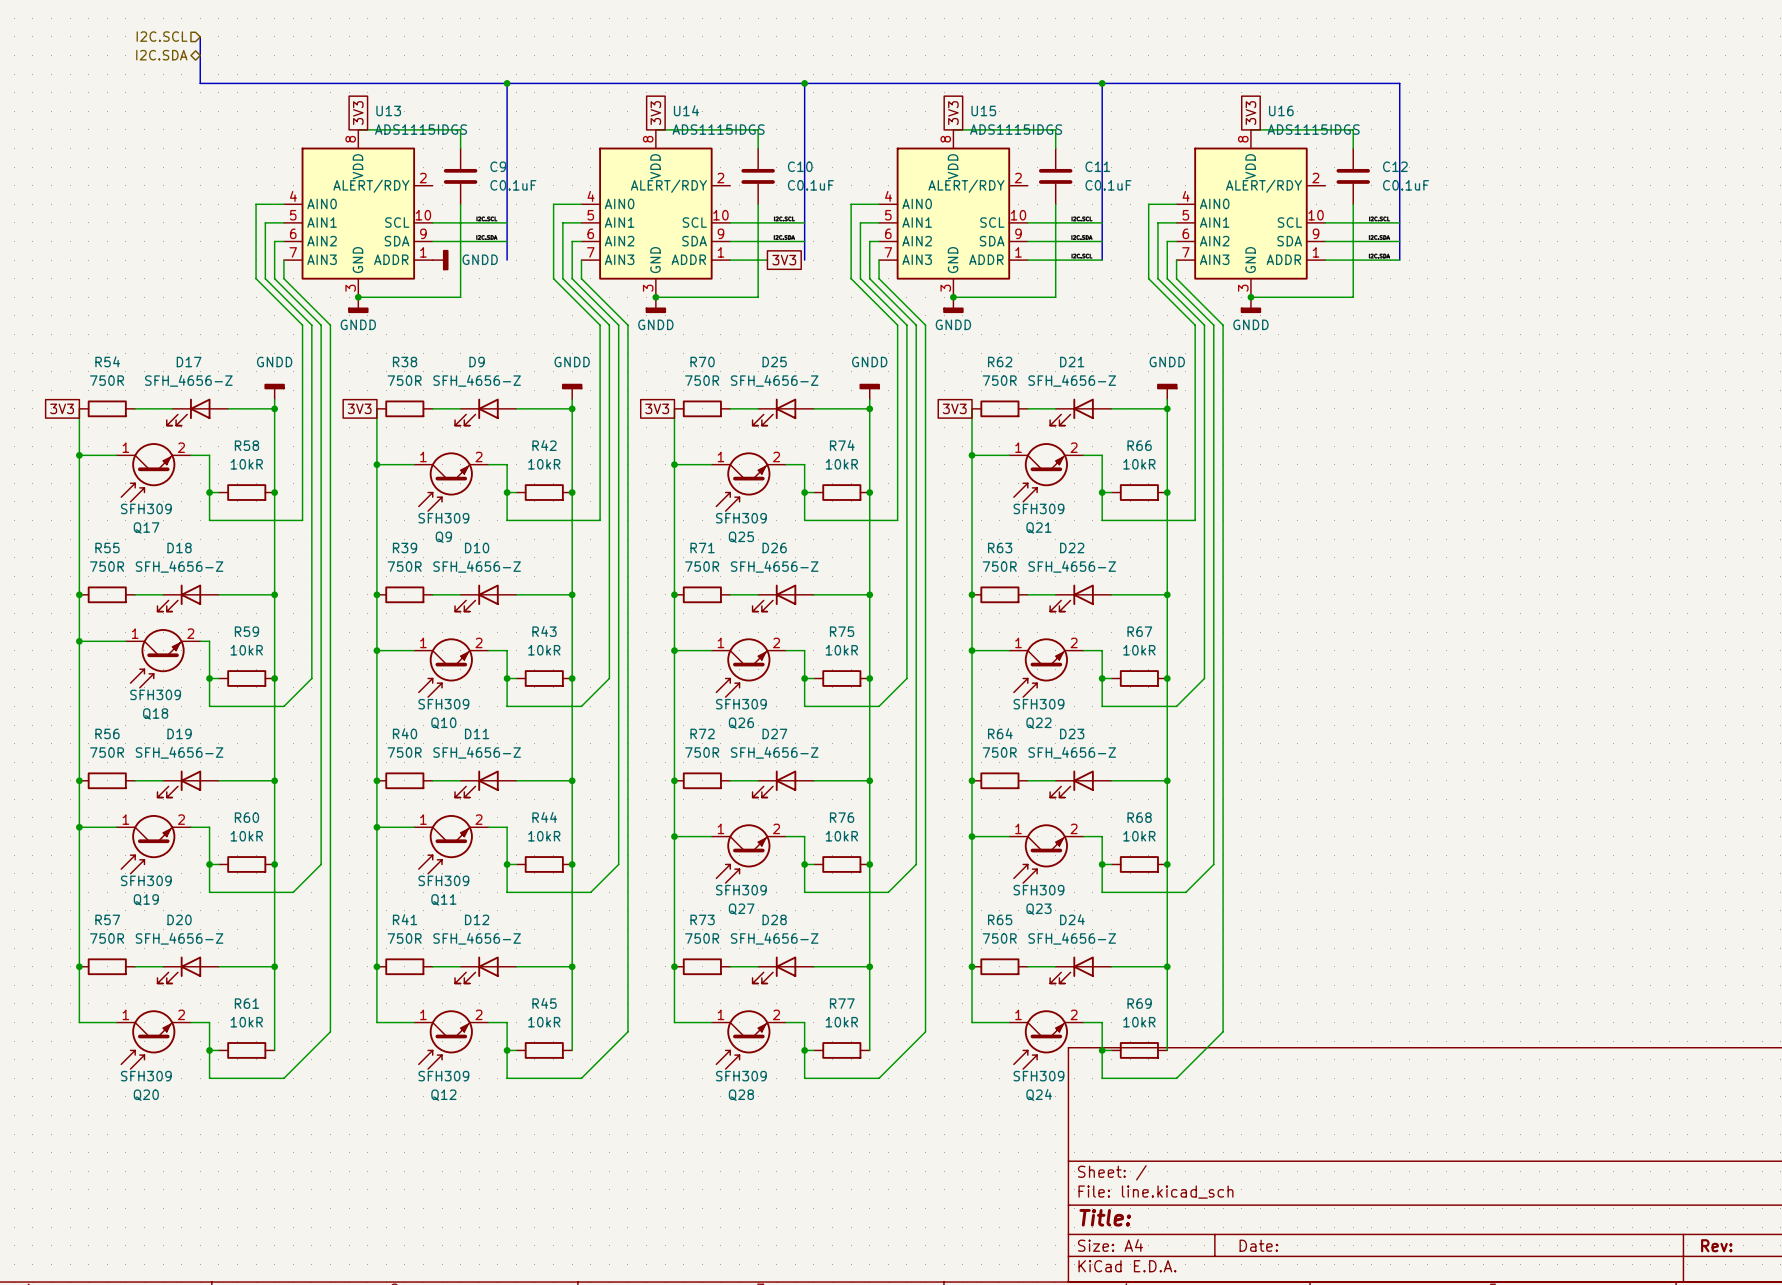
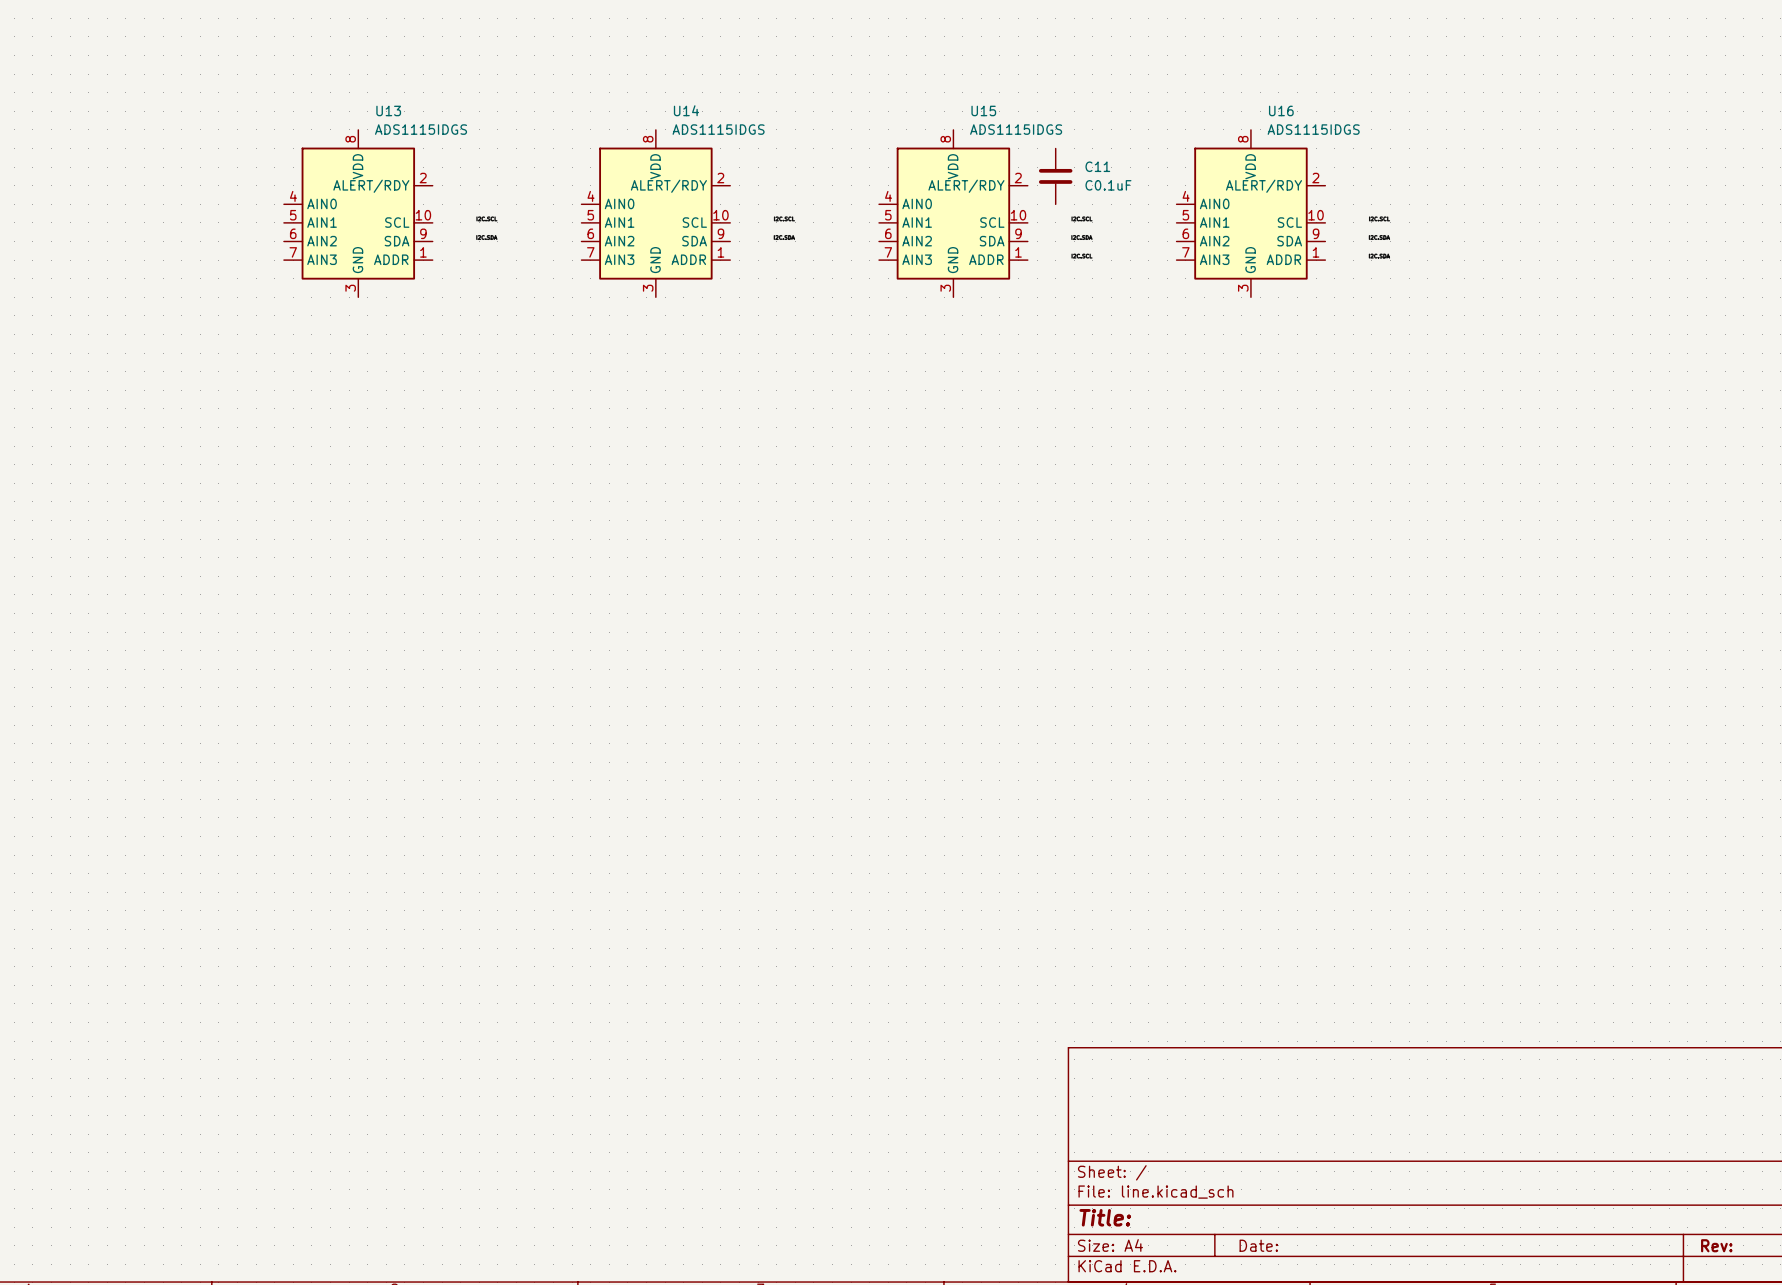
hierarchical label: I2C.SCL (162, 36) -> none
bus: (200, 36) (200, 83) (1399, 83) (1399, 260) -> none
hierarchical label: I2C.SDA (161, 55) -> none
bus: (507, 83) (507, 260) -> none
junction: (507, 83) -> none
bus: (804, 83) (804, 260) -> none
junction: (804, 83) -> none
bus: (1102, 83) (1102, 260) -> none
junction: (1102, 83) -> none
global label: 3V3 (358, 113) -> none
global label: 3V3 (655, 113) -> none
global label: 3V3 (953, 113) -> none
global label: 3V3 (1250, 113) -> none
wire: (358, 129) (460, 129) (460, 148) -> none
wire: (655, 129) (758, 129) (758, 148) -> none
wire: (953, 129) (1055, 129) (1055, 148) -> none
wire: (1250, 129) (1353, 129) (1353, 148) -> none
C9: C0.1uF (460, 176) -> none
C10: C0.1uF (758, 176) -> none
C12: C0.1uF (1353, 176) -> none
wire: (283, 204) (256, 204) (256, 278) (302, 325) (302, 520) (209, 520) (209, 455) (190, 455) -> none
wire: (460, 204) (460, 297) (358, 297) -> none
wire: (581, 204) (553, 204) (553, 278) (600, 325) (600, 520) (507, 520) (507, 464) (488, 464) -> none
wire: (758, 204) (758, 297) (655, 297) -> none
wire: (879, 204) (851, 204) (851, 278) (897, 325) (897, 520) (804, 520) (804, 464) (786, 464) -> none
wire: (1055, 204) (1055, 297) (953, 297) -> none
wire: (1176, 204) (1148, 204) (1148, 278) (1195, 325) (1195, 520) (1102, 520) (1102, 455) (1083, 455) -> none
wire: (1353, 204) (1353, 297) (1250, 297) -> none
wire: (283, 222) (265, 222) (265, 278) (311, 325) (311, 678) (283, 706) (209, 706) (209, 641) (200, 641) -> none
wire: (432, 222) (507, 222) -> none
wire: (581, 222) (562, 222) (562, 278) (609, 325) (609, 678) (581, 706) (507, 706) (507, 650) (488, 650) -> none
wire: (730, 222) (804, 222) -> none
wire: (879, 222) (860, 222) (860, 278) (906, 325) (906, 678) (879, 706) (804, 706) (804, 650) (786, 650) -> none
wire: (1027, 222) (1102, 222) -> none
wire: (1176, 222) (1157, 222) (1157, 278) (1204, 325) (1204, 678) (1176, 706) (1102, 706) (1102, 650) (1083, 650) -> none
wire: (1325, 222) (1399, 222) -> none
wire: (283, 241) (274, 241) (274, 278) (321, 325) (321, 864) (293, 892) (209, 892) (209, 827) (190, 827) -> none
wire: (432, 241) (507, 241) -> none
wire: (581, 241) (572, 241) (572, 278) (618, 325) (618, 864) (590, 892) (507, 892) (507, 827) (488, 827) -> none
wire: (730, 241) (804, 241) -> none
wire: (879, 241) (869, 241) (869, 278) (916, 325) (916, 864) (888, 892) (804, 892) (804, 836) (786, 836) -> none
wire: (1027, 241) (1102, 241) -> none
wire: (1176, 241) (1167, 241) (1167, 278) (1213, 325) (1213, 864) (1185, 892) (1102, 892) (1102, 836) (1083, 836) -> none
wire: (1325, 241) (1399, 241) -> none
wire: (283, 260) (283, 278) (330, 325) (330, 1031) (283, 1078) (209, 1078) (209, 1022) (190, 1022) -> none
power symbol: GNDD (440, 260) -> none
wire: (581, 260) (581, 278) (627, 325) (627, 1031) (581, 1078) (507, 1078) (507, 1022) (488, 1022) -> none
wire: (730, 260) (767, 260) -> none
global label: 3V3 (784, 260) -> none
wire: (879, 260) (879, 278) (925, 325) (925, 1031) (879, 1078) (804, 1078) (804, 1022) (786, 1022) -> none
wire: (1027, 260) (1102, 260) -> none
wire: (1176, 260) (1176, 278) (1223, 325) (1223, 1031) (1176, 1078) (1102, 1078) (1102, 1022) (1083, 1022) -> none
wire: (1325, 260) (1399, 260) -> none
junction: (358, 297) -> none
junction: (655, 297) -> none
junction: (953, 297) -> none
junction: (1250, 297) -> none
power symbol: GNDD (358, 305) -> none
power symbol: GNDD (655, 305) -> none
power symbol: GNDD (953, 305) -> none
power symbol: GNDD (1250, 305) -> none
power symbol: GNDD (274, 391) -> none
power symbol: GNDD (572, 391) -> none
power symbol: GNDD (869, 391) -> none
power symbol: GNDD (1167, 391) -> none
wire: (274, 399) (274, 1050) -> none
wire: (572, 399) (572, 1050) -> none
wire: (869, 399) (869, 1050) -> none
wire: (1167, 399) (1167, 1050) -> none
global label: 3V3 (62, 408) -> none
wire: (79, 408) (79, 1022) (116, 1022) -> none
R54: 750R (107, 408) -> none
wire: (135, 408) (172, 408) -> none
wire: (228, 408) (274, 408) -> none
junction: (274, 408) -> none
global label: 3V3 (359, 408) -> none
wire: (376, 408) (376, 1022) (414, 1022) -> none
R38: 750R (404, 408) -> none
wire: (432, 408) (460, 408) -> none
wire: (516, 408) (572, 408) -> none
junction: (572, 408) -> none
global label: 3V3 (657, 408) -> none
wire: (674, 408) (674, 1022) (711, 1022) -> none
R70: 750R (702, 408) -> none
wire: (730, 408) (758, 408) -> none
wire: (813, 408) (869, 408) -> none
junction: (869, 408) -> none
global label: 3V3 (954, 408) -> none
wire: (972, 408) (972, 1022) (1009, 1022) -> none
R62: 750R (999, 408) -> none
wire: (1027, 408) (1055, 408) -> none
wire: (1111, 408) (1167, 408) -> none
junction: (1167, 408) -> none
D17: SFH_4656-Z (197, 412) -> none
D9: SFH_4656-Z (485, 412) -> none
D25: SFH_4656-Z (783, 412) -> none
D21: SFH_4656-Z (1080, 412) -> none
wire: (79, 455) (116, 455) -> none
junction: (79, 455) -> none
wire: (972, 455) (1009, 455) -> none
junction: (972, 455) -> none
wire: (376, 464) (414, 464) -> none
junction: (376, 464) -> none
wire: (674, 464) (711, 464) -> none
junction: (674, 464) -> none
Q17: SFH309 (153, 472) -> none
Q21: SFH309 (1046, 472) -> none
Q9: SFH309 (451, 481) -> none
Q25: SFH309 (748, 481) -> none
wire: (209, 492) (218, 492) -> none
junction: (209, 492) -> none
R58: 10kR (246, 492) -> none
junction: (274, 492) -> none
wire: (507, 492) (516, 492) -> none
junction: (507, 492) -> none
R42: 10kR (544, 492) -> none
junction: (572, 492) -> none
wire: (804, 492) (813, 492) -> none
junction: (804, 492) -> none
R74: 10kR (841, 492) -> none
junction: (869, 492) -> none
wire: (1102, 492) (1111, 492) -> none
junction: (1102, 492) -> none
R66: 10kR (1139, 492) -> none
junction: (1167, 492) -> none
junction: (79, 594) -> none
R55: 750R (107, 594) -> none
wire: (135, 594) (163, 594) -> none
wire: (218, 594) (274, 594) -> none
junction: (274, 594) -> none
junction: (376, 594) -> none
R39: 750R (404, 594) -> none
wire: (432, 594) (460, 594) -> none
wire: (516, 594) (572, 594) -> none
junction: (572, 594) -> none
junction: (674, 594) -> none
R71: 750R (702, 594) -> none
wire: (730, 594) (758, 594) -> none
wire: (813, 594) (869, 594) -> none
junction: (869, 594) -> none
junction: (972, 594) -> none
R63: 750R (999, 594) -> none
wire: (1027, 594) (1055, 594) -> none
wire: (1111, 594) (1167, 594) -> none
junction: (1167, 594) -> none
D18: SFH_4656-Z (188, 598) -> none
D10: SFH_4656-Z (485, 598) -> none
D26: SFH_4656-Z (783, 598) -> none
D22: SFH_4656-Z (1080, 598) -> none
wire: (79, 641) (125, 641) -> none
junction: (79, 641) -> none
wire: (376, 650) (414, 650) -> none
junction: (376, 650) -> none
wire: (674, 650) (711, 650) -> none
junction: (674, 650) -> none
wire: (972, 650) (1009, 650) -> none
junction: (972, 650) -> none
Q18: SFH309 (163, 658) -> none
Q10: SFH309 (451, 667) -> none
Q26: SFH309 (748, 667) -> none
Q22: SFH309 (1046, 667) -> none
wire: (209, 678) (218, 678) -> none
junction: (209, 678) -> none
R59: 10kR (246, 678) -> none
junction: (274, 678) -> none
wire: (507, 678) (516, 678) -> none
junction: (507, 678) -> none
R43: 10kR (544, 678) -> none
junction: (572, 678) -> none
wire: (804, 678) (813, 678) -> none
junction: (804, 678) -> none
R75: 10kR (841, 678) -> none
junction: (869, 678) -> none
wire: (1102, 678) (1111, 678) -> none
junction: (1102, 678) -> none
R67: 10kR (1139, 678) -> none
junction: (1167, 678) -> none
junction: (79, 780) -> none
R56: 750R (107, 780) -> none
wire: (135, 780) (163, 780) -> none
wire: (218, 780) (274, 780) -> none
junction: (274, 780) -> none
junction: (376, 780) -> none
R40: 750R (404, 780) -> none
wire: (432, 780) (460, 780) -> none
wire: (516, 780) (572, 780) -> none
junction: (572, 780) -> none
junction: (674, 780) -> none
R72: 750R (702, 780) -> none
wire: (730, 780) (758, 780) -> none
wire: (813, 780) (869, 780) -> none
junction: (869, 780) -> none
junction: (972, 780) -> none
R64: 750R (999, 780) -> none
wire: (1027, 780) (1055, 780) -> none
wire: (1111, 780) (1167, 780) -> none
junction: (1167, 780) -> none
D19: SFH_4656-Z (188, 784) -> none
D11: SFH_4656-Z (485, 784) -> none
D27: SFH_4656-Z (783, 784) -> none
D23: SFH_4656-Z (1080, 784) -> none
wire: (79, 827) (116, 827) -> none
junction: (79, 827) -> none
wire: (376, 827) (414, 827) -> none
junction: (376, 827) -> none
wire: (674, 836) (711, 836) -> none
junction: (674, 836) -> none
wire: (972, 836) (1009, 836) -> none
junction: (972, 836) -> none
Q19: SFH309 (153, 844) -> none
Q11: SFH309 (451, 844) -> none
Q27: SFH309 (748, 853) -> none
Q23: SFH309 (1046, 853) -> none
wire: (209, 864) (218, 864) -> none
junction: (209, 864) -> none
R60: 10kR (246, 864) -> none
junction: (274, 864) -> none
wire: (507, 864) (516, 864) -> none
junction: (507, 864) -> none
R44: 10kR (544, 864) -> none
junction: (572, 864) -> none
wire: (804, 864) (813, 864) -> none
junction: (804, 864) -> none
R76: 10kR (841, 864) -> none
junction: (869, 864) -> none
wire: (1102, 864) (1111, 864) -> none
junction: (1102, 864) -> none
R68: 10kR (1139, 864) -> none
junction: (1167, 864) -> none
junction: (79, 966) -> none
R57: 750R (107, 966) -> none
wire: (135, 966) (163, 966) -> none
wire: (218, 966) (274, 966) -> none
junction: (274, 966) -> none
junction: (376, 966) -> none
R41: 750R (404, 966) -> none
wire: (432, 966) (460, 966) -> none
wire: (516, 966) (572, 966) -> none
junction: (572, 966) -> none
junction: (674, 966) -> none
R73: 750R (702, 966) -> none
wire: (730, 966) (758, 966) -> none
wire: (813, 966) (869, 966) -> none
junction: (869, 966) -> none
junction: (972, 966) -> none
R65: 750R (999, 966) -> none
wire: (1027, 966) (1055, 966) -> none
wire: (1111, 966) (1167, 966) -> none
junction: (1167, 966) -> none
D20: SFH_4656-Z (188, 970) -> none
D12: SFH_4656-Z (485, 970) -> none
D28: SFH_4656-Z (783, 970) -> none
D24: SFH_4656-Z (1080, 970) -> none
Q20: SFH309 (153, 1039) -> none
Q12: SFH309 (451, 1039) -> none
Q28: SFH309 (748, 1039) -> none
Q24: SFH309 (1046, 1039) -> none
wire: (209, 1050) (218, 1050) -> none
junction: (209, 1050) -> none
R61: 10kR (246, 1050) -> none
wire: (507, 1050) (516, 1050) -> none
junction: (507, 1050) -> none
R45: 10kR (544, 1050) -> none
wire: (804, 1050) (813, 1050) -> none
junction: (804, 1050) -> none
R77: 10kR (841, 1050) -> none
wire: (1102, 1050) (1111, 1050) -> none
junction: (1102, 1050) -> none
R69: 10kR (1139, 1050) -> none

